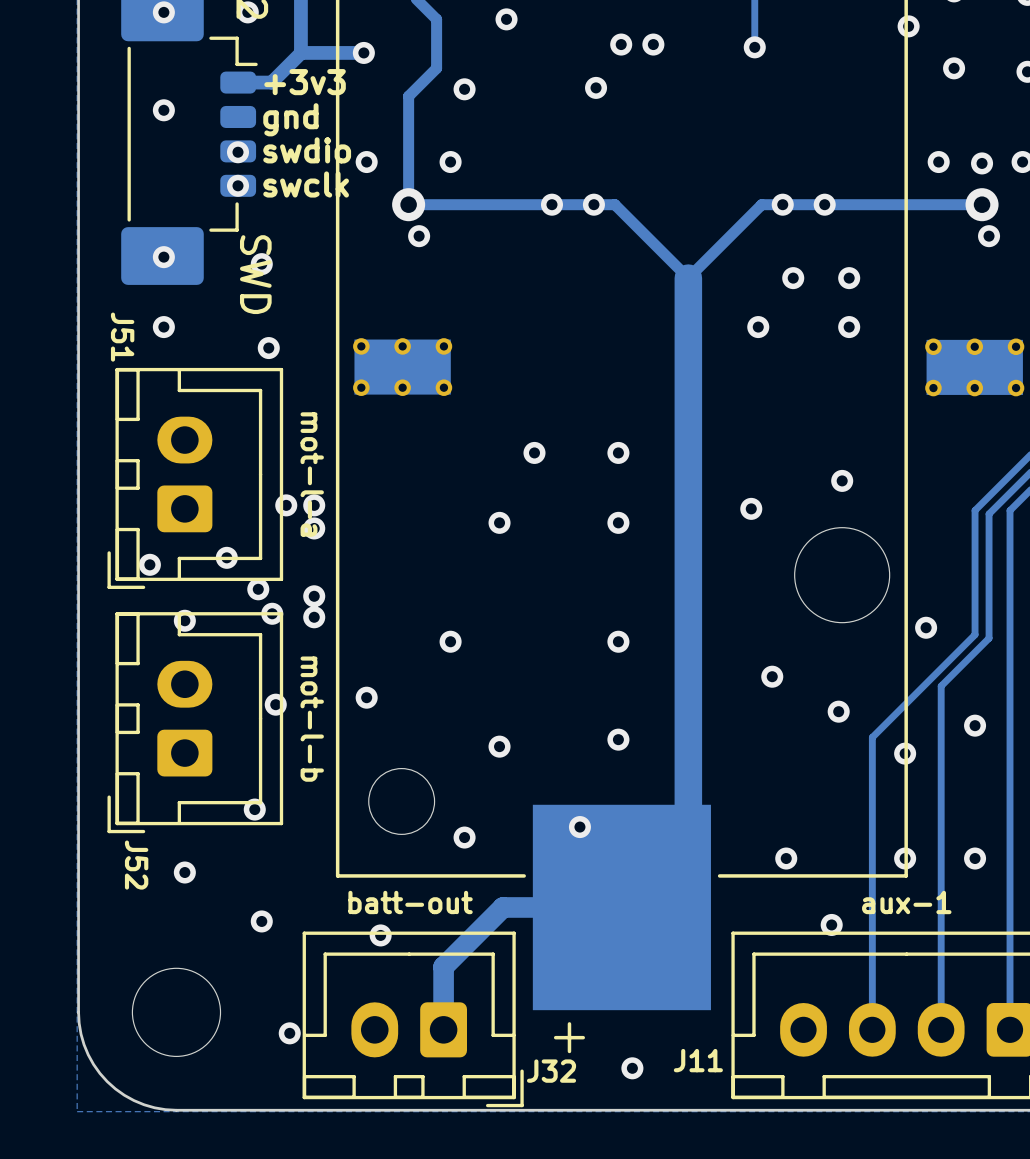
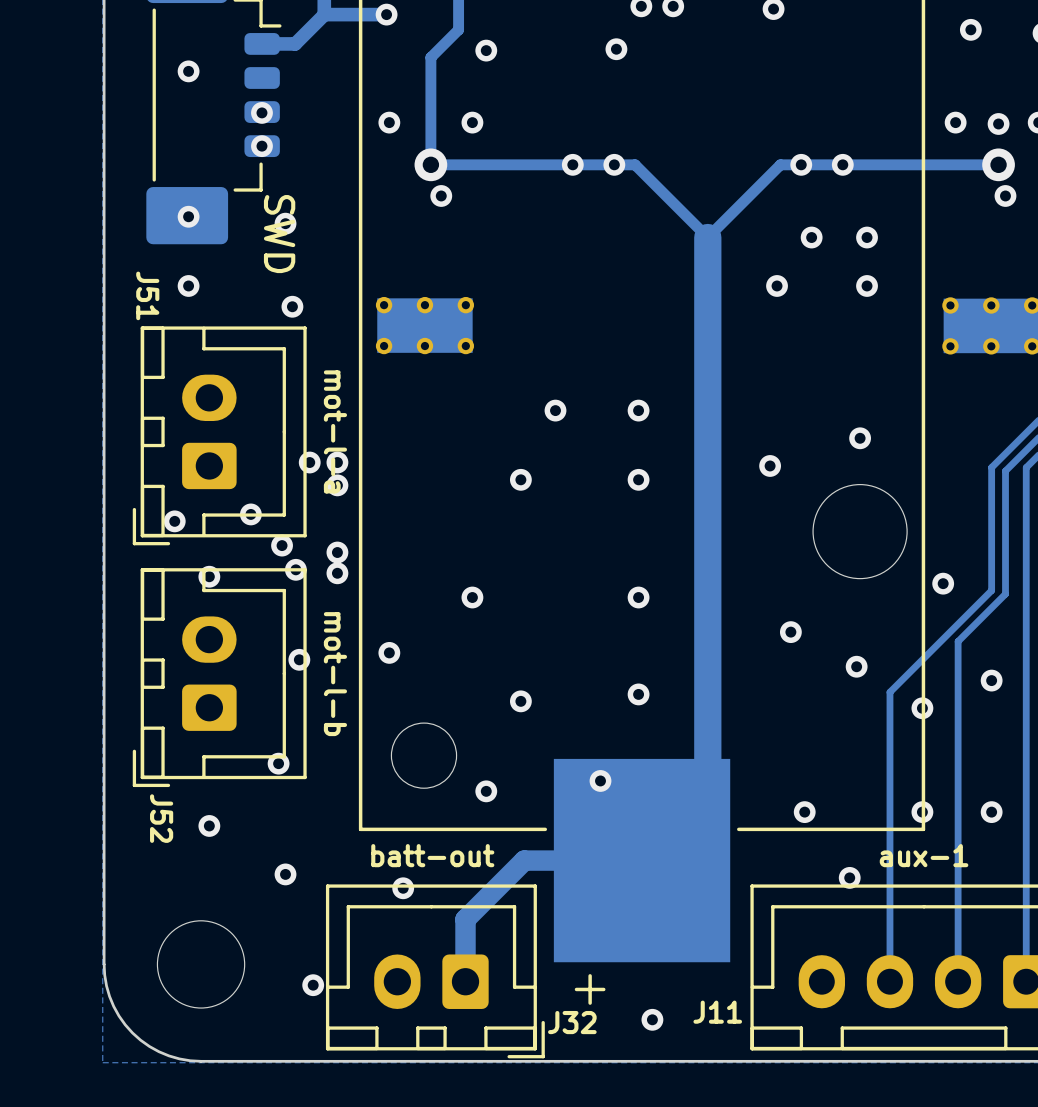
text: +3v3 (305, 82) -> none
text: gnd (290, 119) -> none
text: swdio (307, 150) -> none
text: swclk (306, 184) -> none

